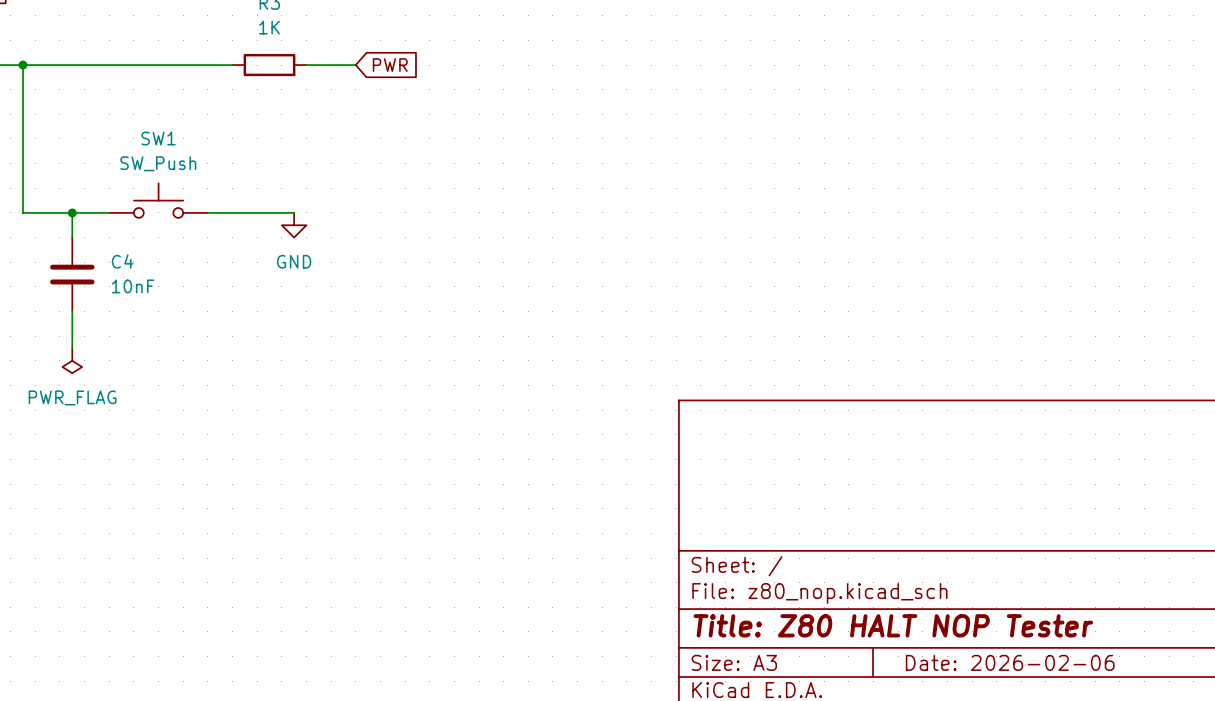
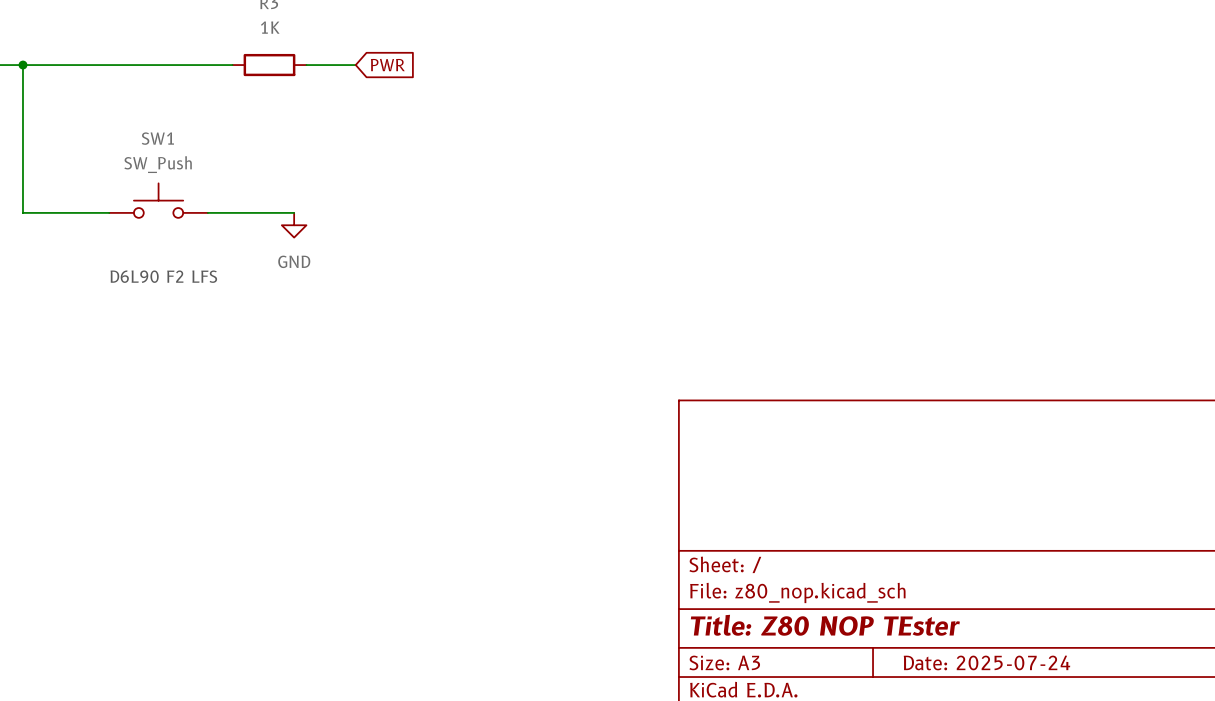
wire: (72, 212) (72, 237) -> none
junction: (72, 212) -> none
C4: 10nF (72, 274) -> none
text: none -> D6L90 F2 LFS (163, 276)
wire: (72, 311) (72, 348) -> none
power symbol: PWR_FLAG (72, 360) -> none
title block: Title: Z80 HALT NOP Tester (893, 625) -> Title: Z80 NOP TEster (825, 625)
title block: Date: 2026-02-06 (1010, 662) -> Date: 2025-07-24 (986, 662)

